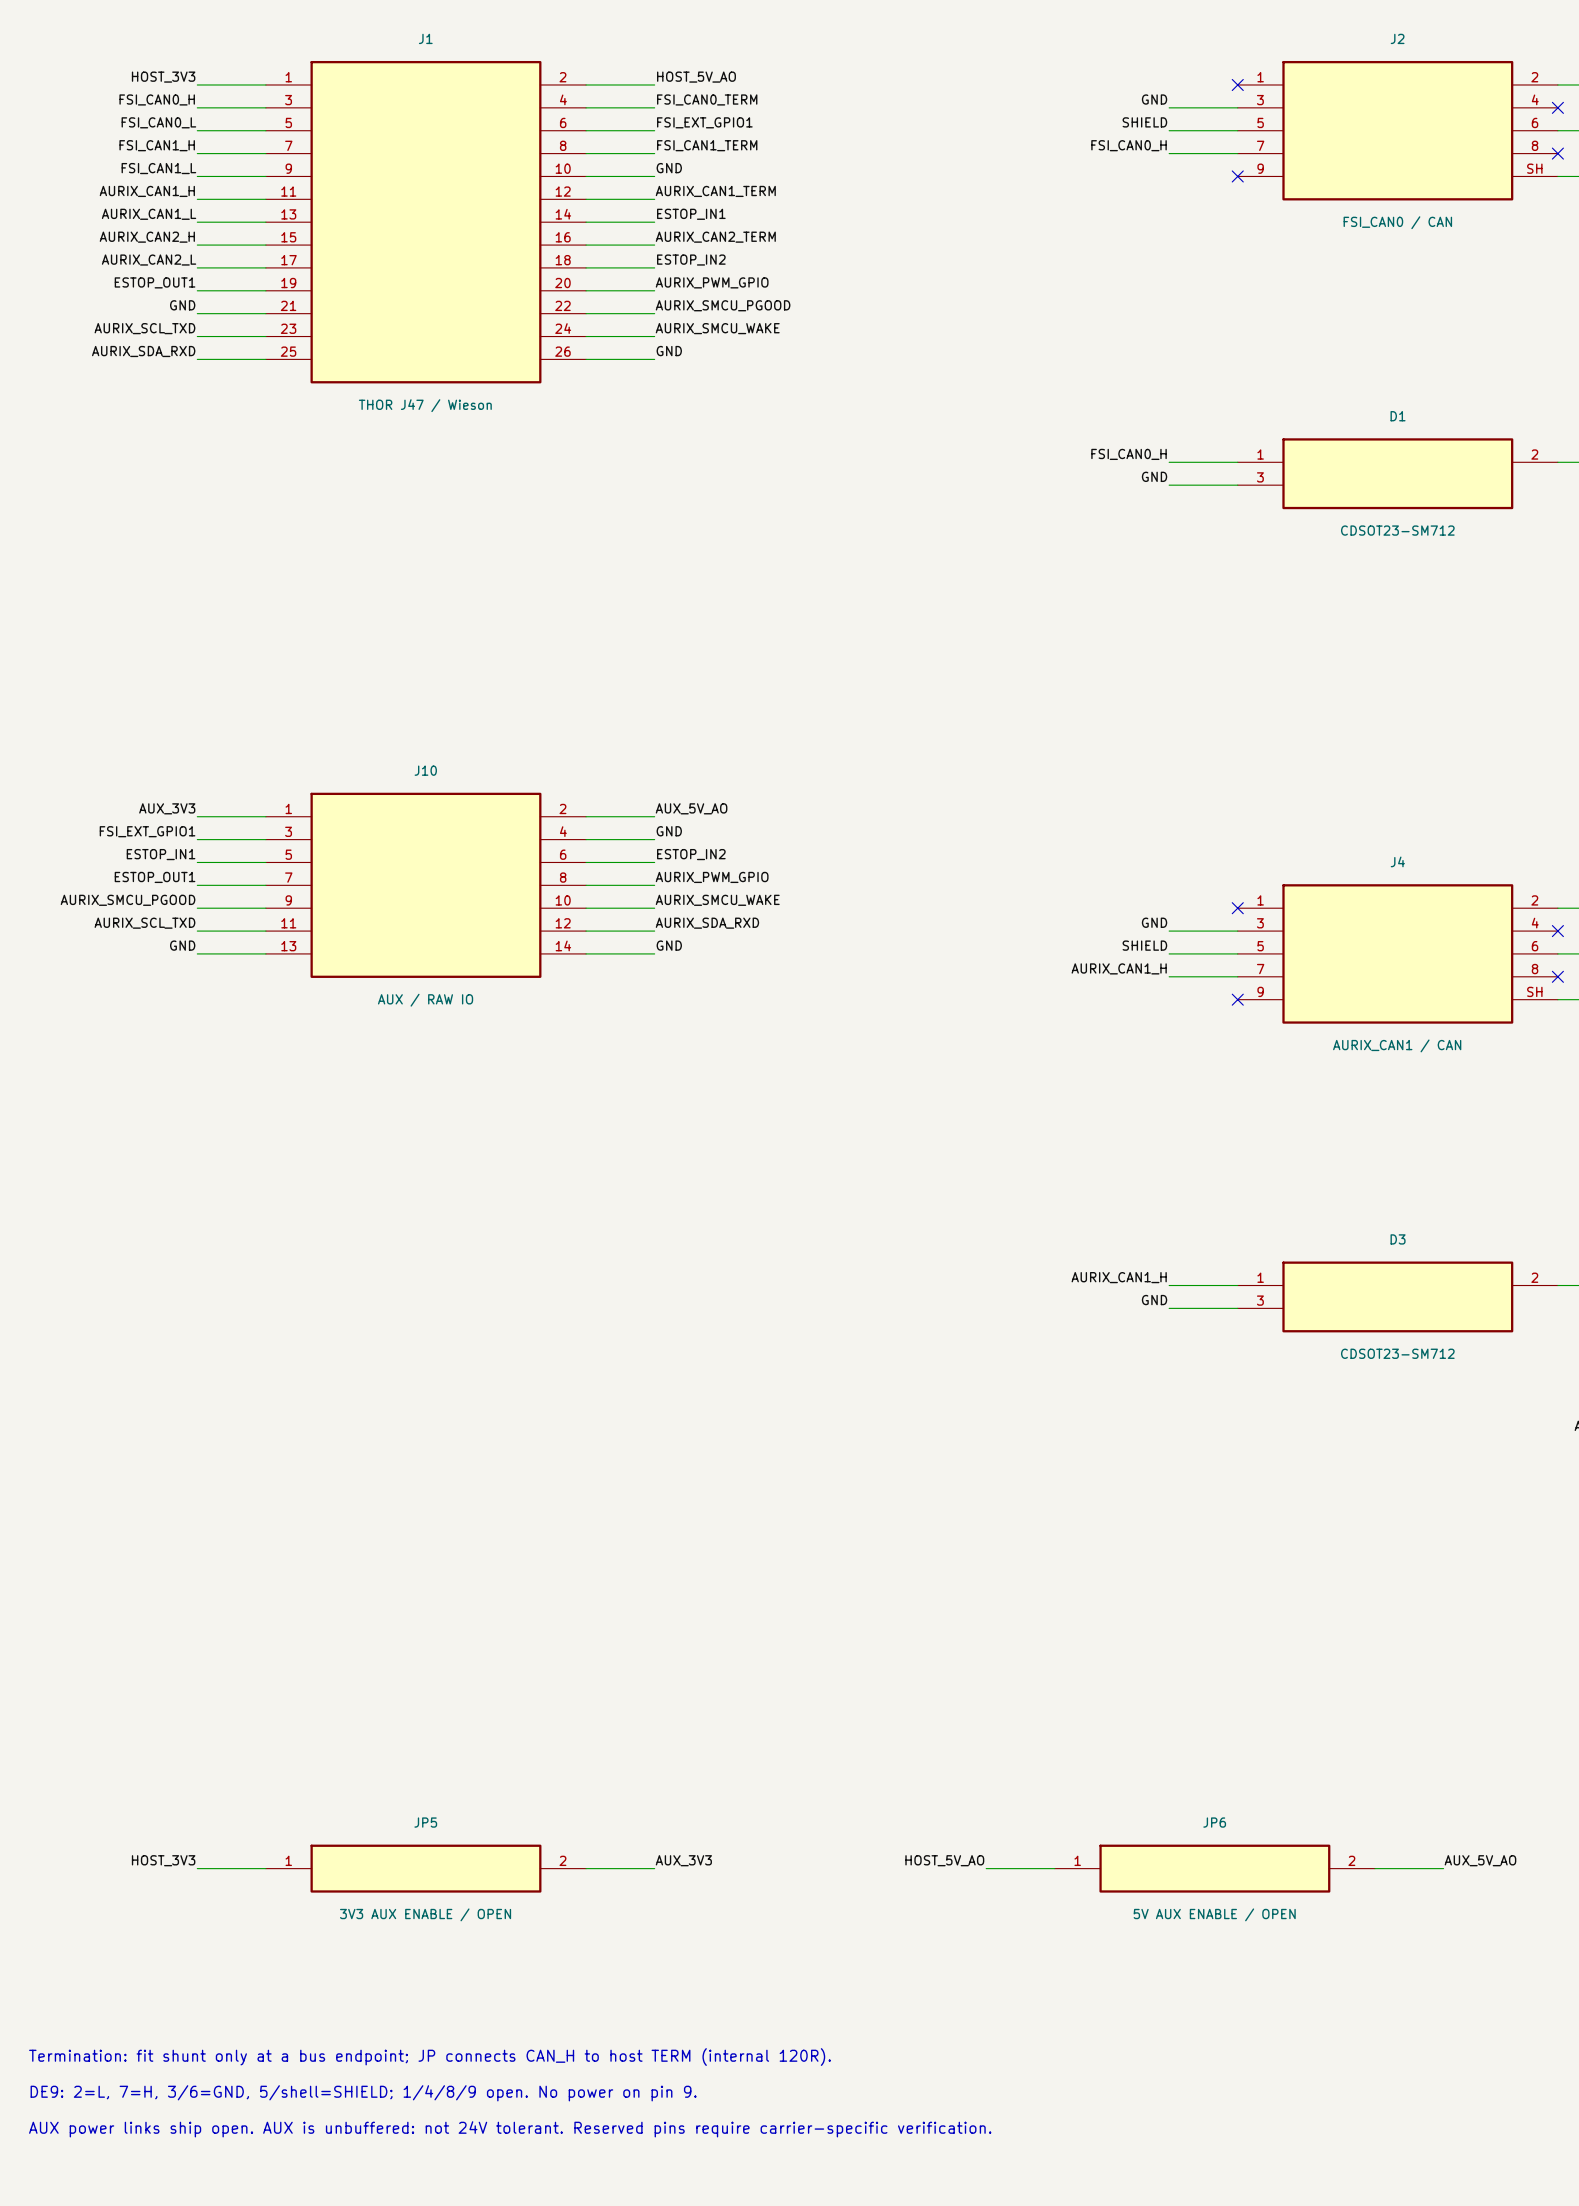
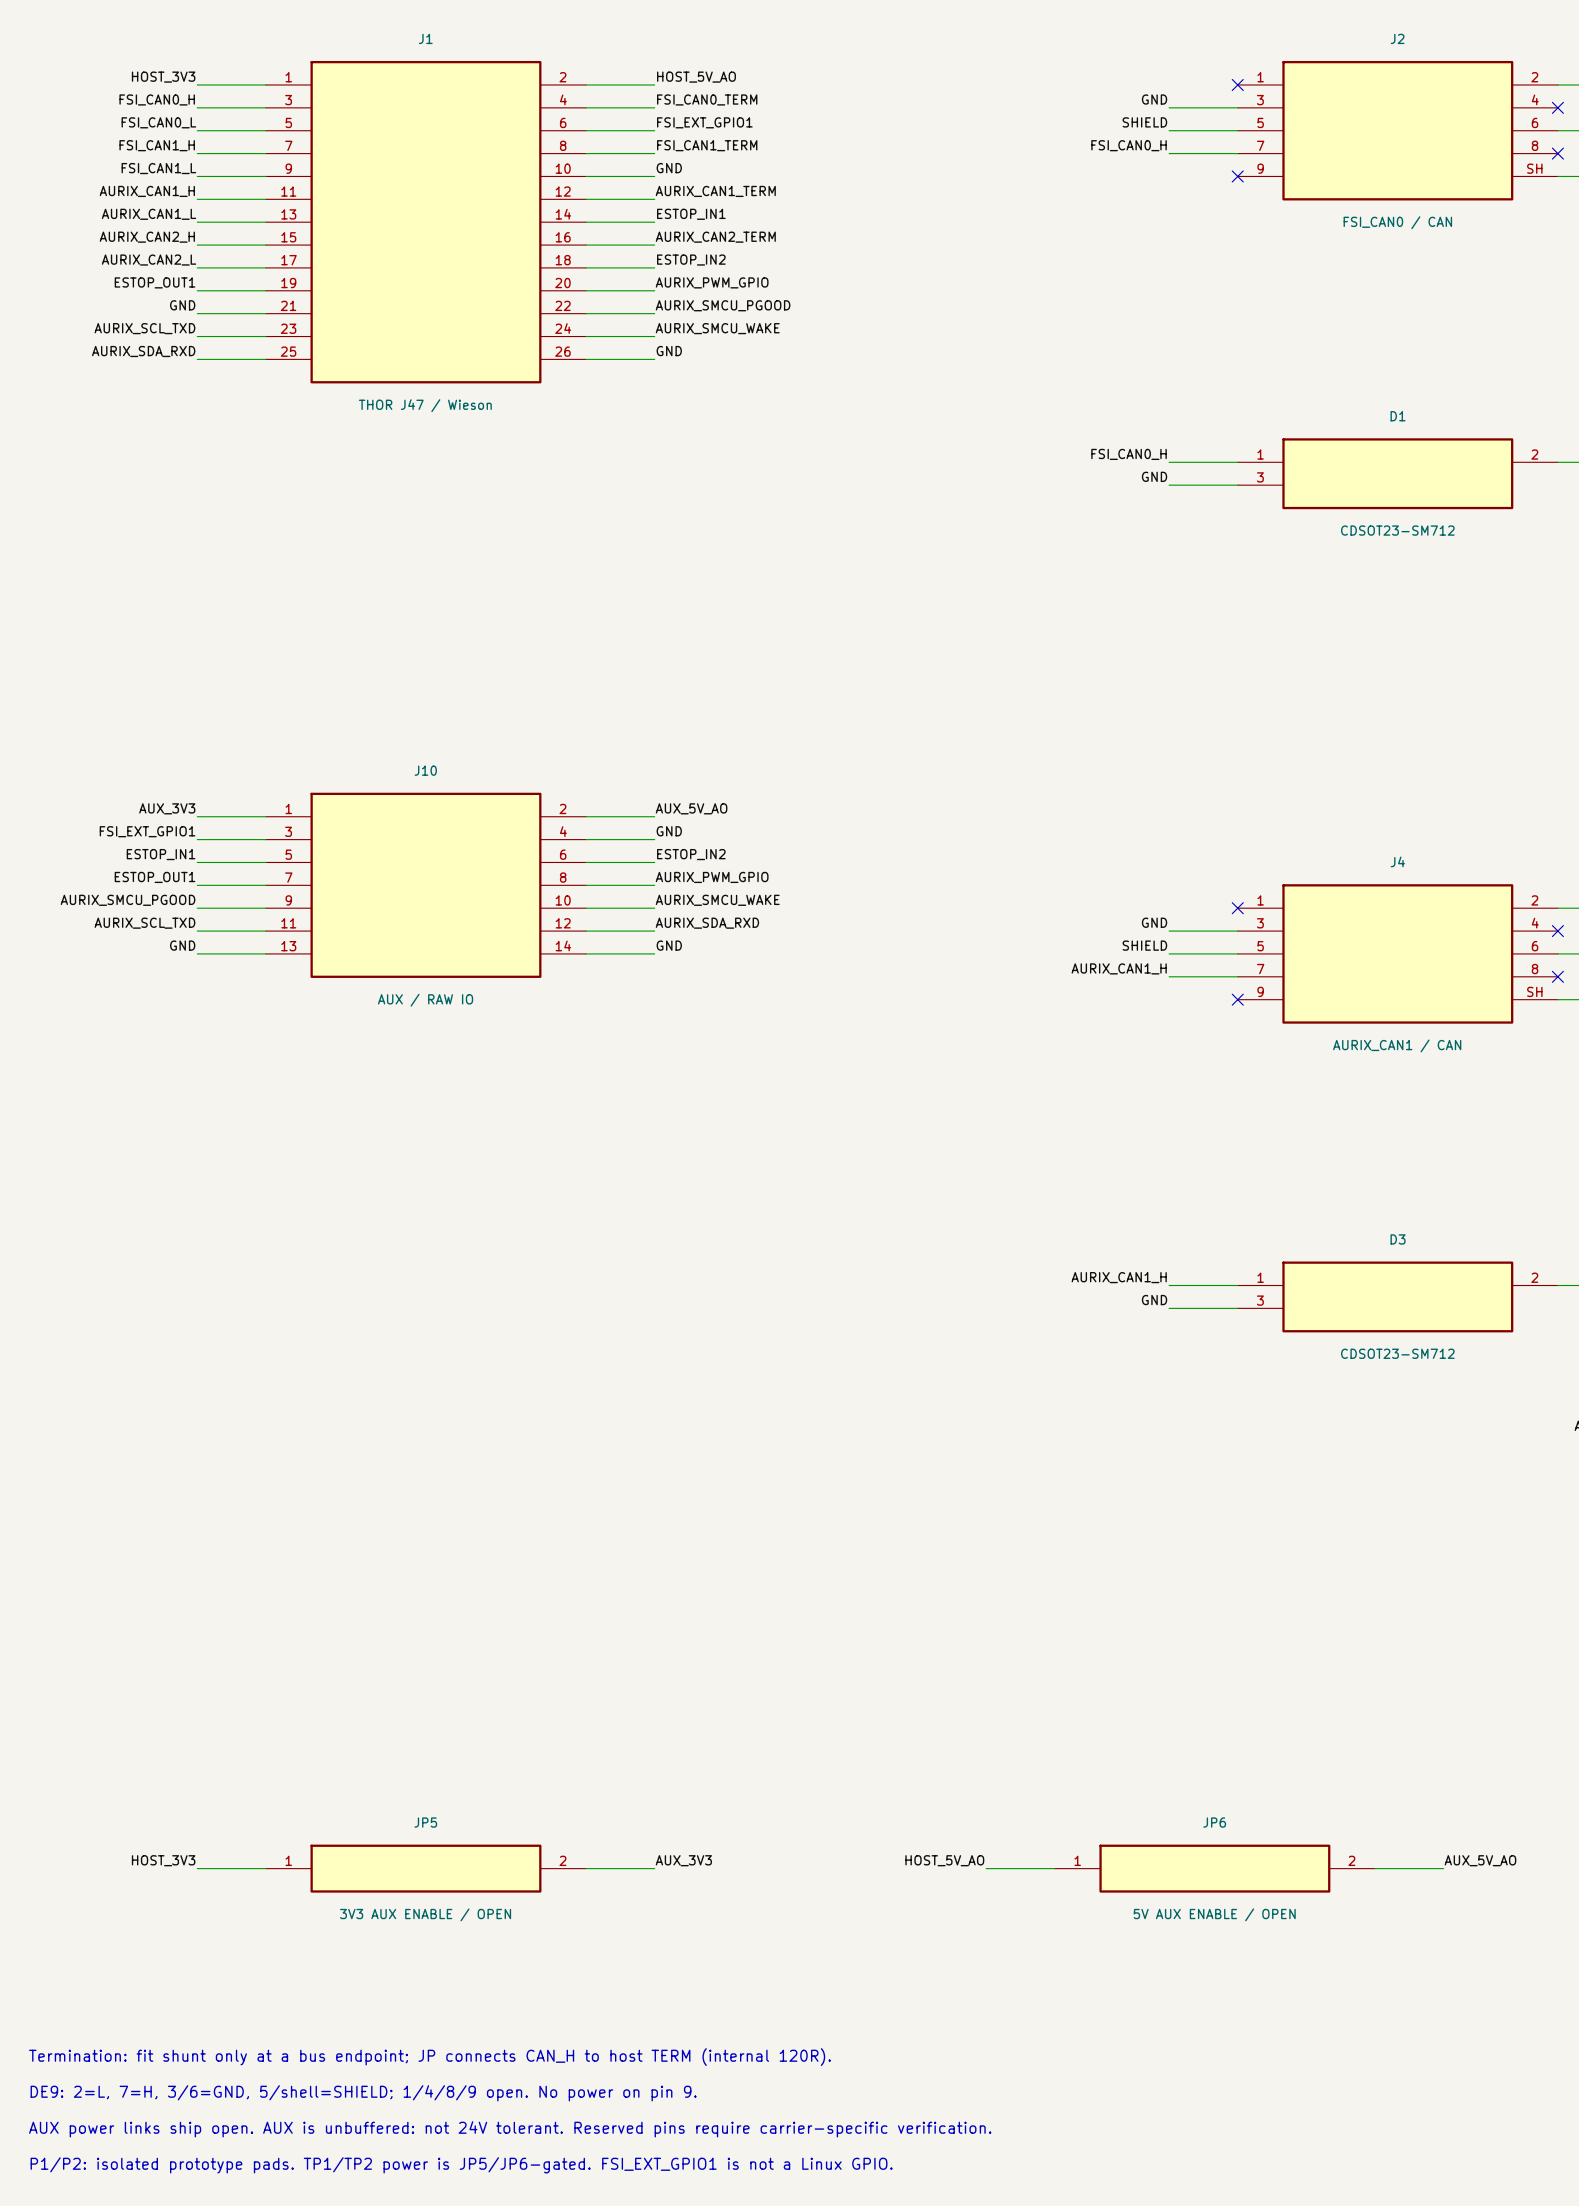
text: none -> P1/P2: isolated prototype pads. TP1/TP2 power is JP5/JP6-gated. FSI_EXT_GPIO1 is not a Linux GPIO. (461, 2165)

